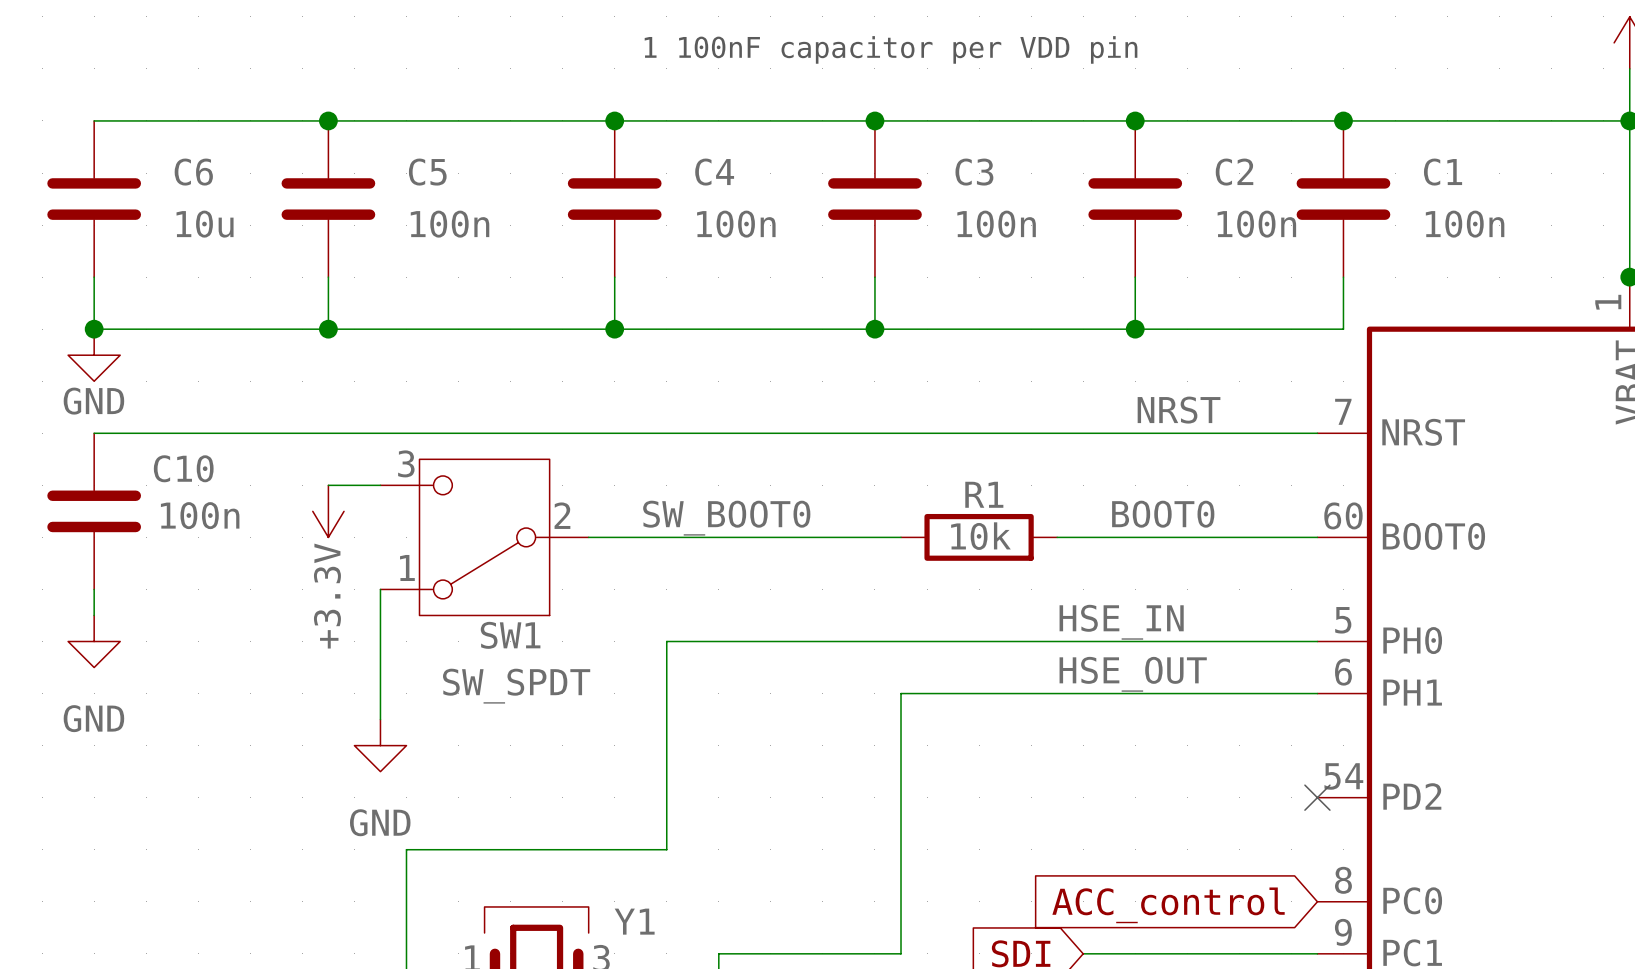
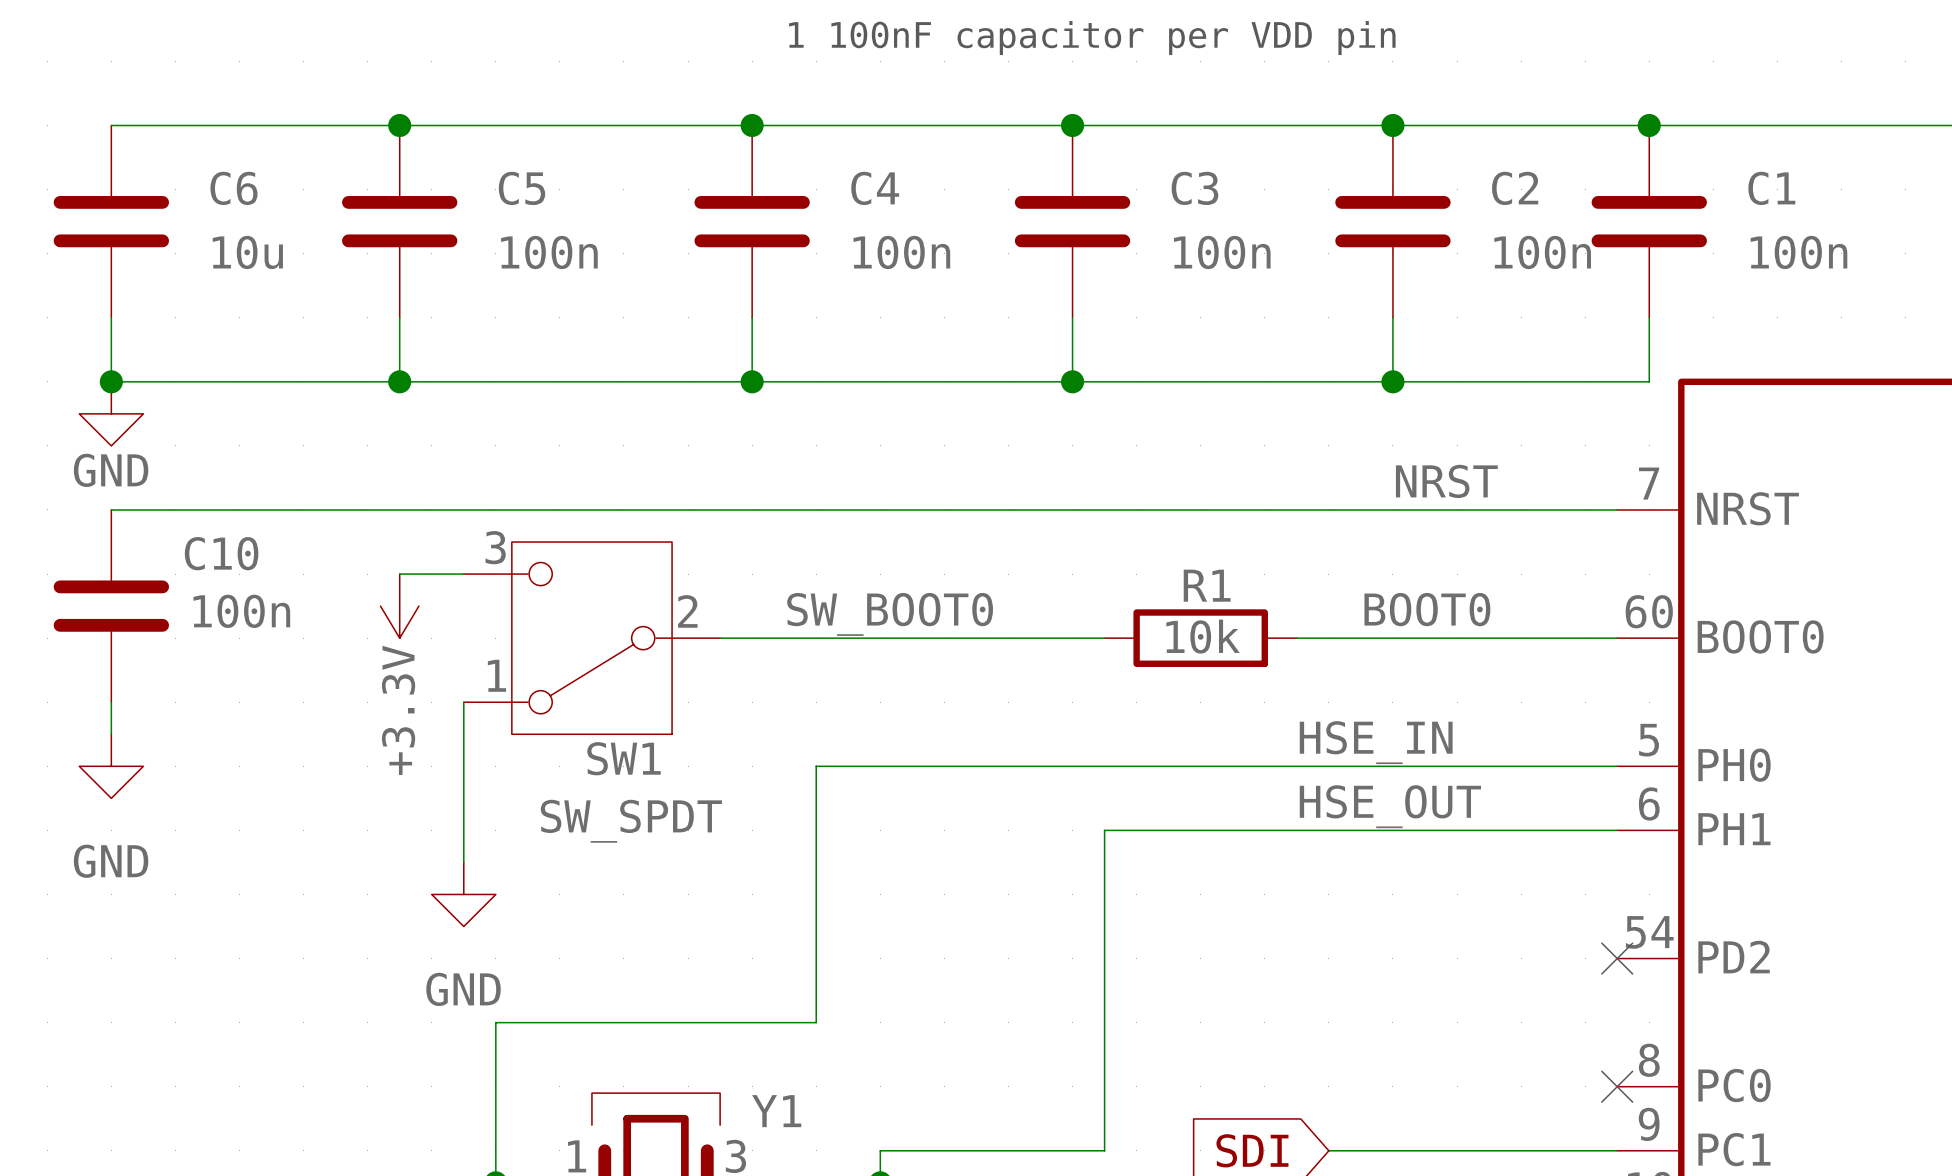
no-connect mark: none -> (1617, 1086)
global label: ACC_control (1168, 905) -> none

